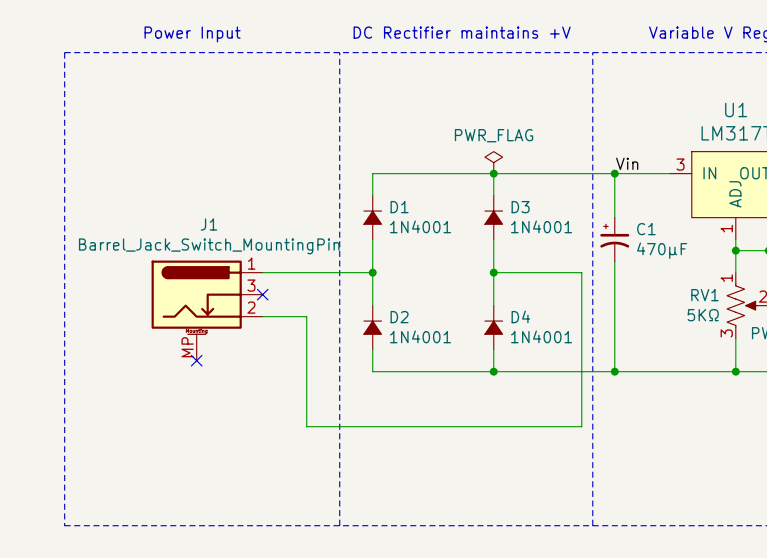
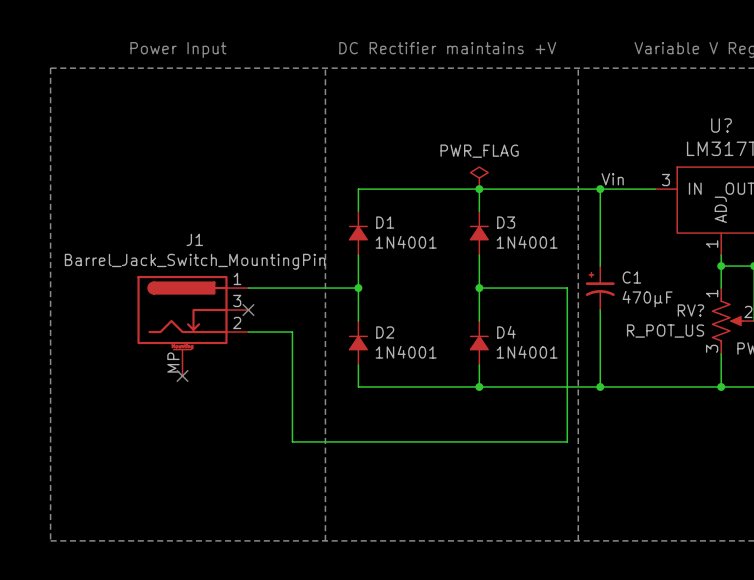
U1 name: U1 (736, 109) -> U? (721, 125)
C1 position: (614, 239) -> (600, 288)
RV1 name: RV1 (705, 295) -> RV? (690, 310)
RV1 value: 5KΩ (703, 315) -> R_POT_US (665, 331)

